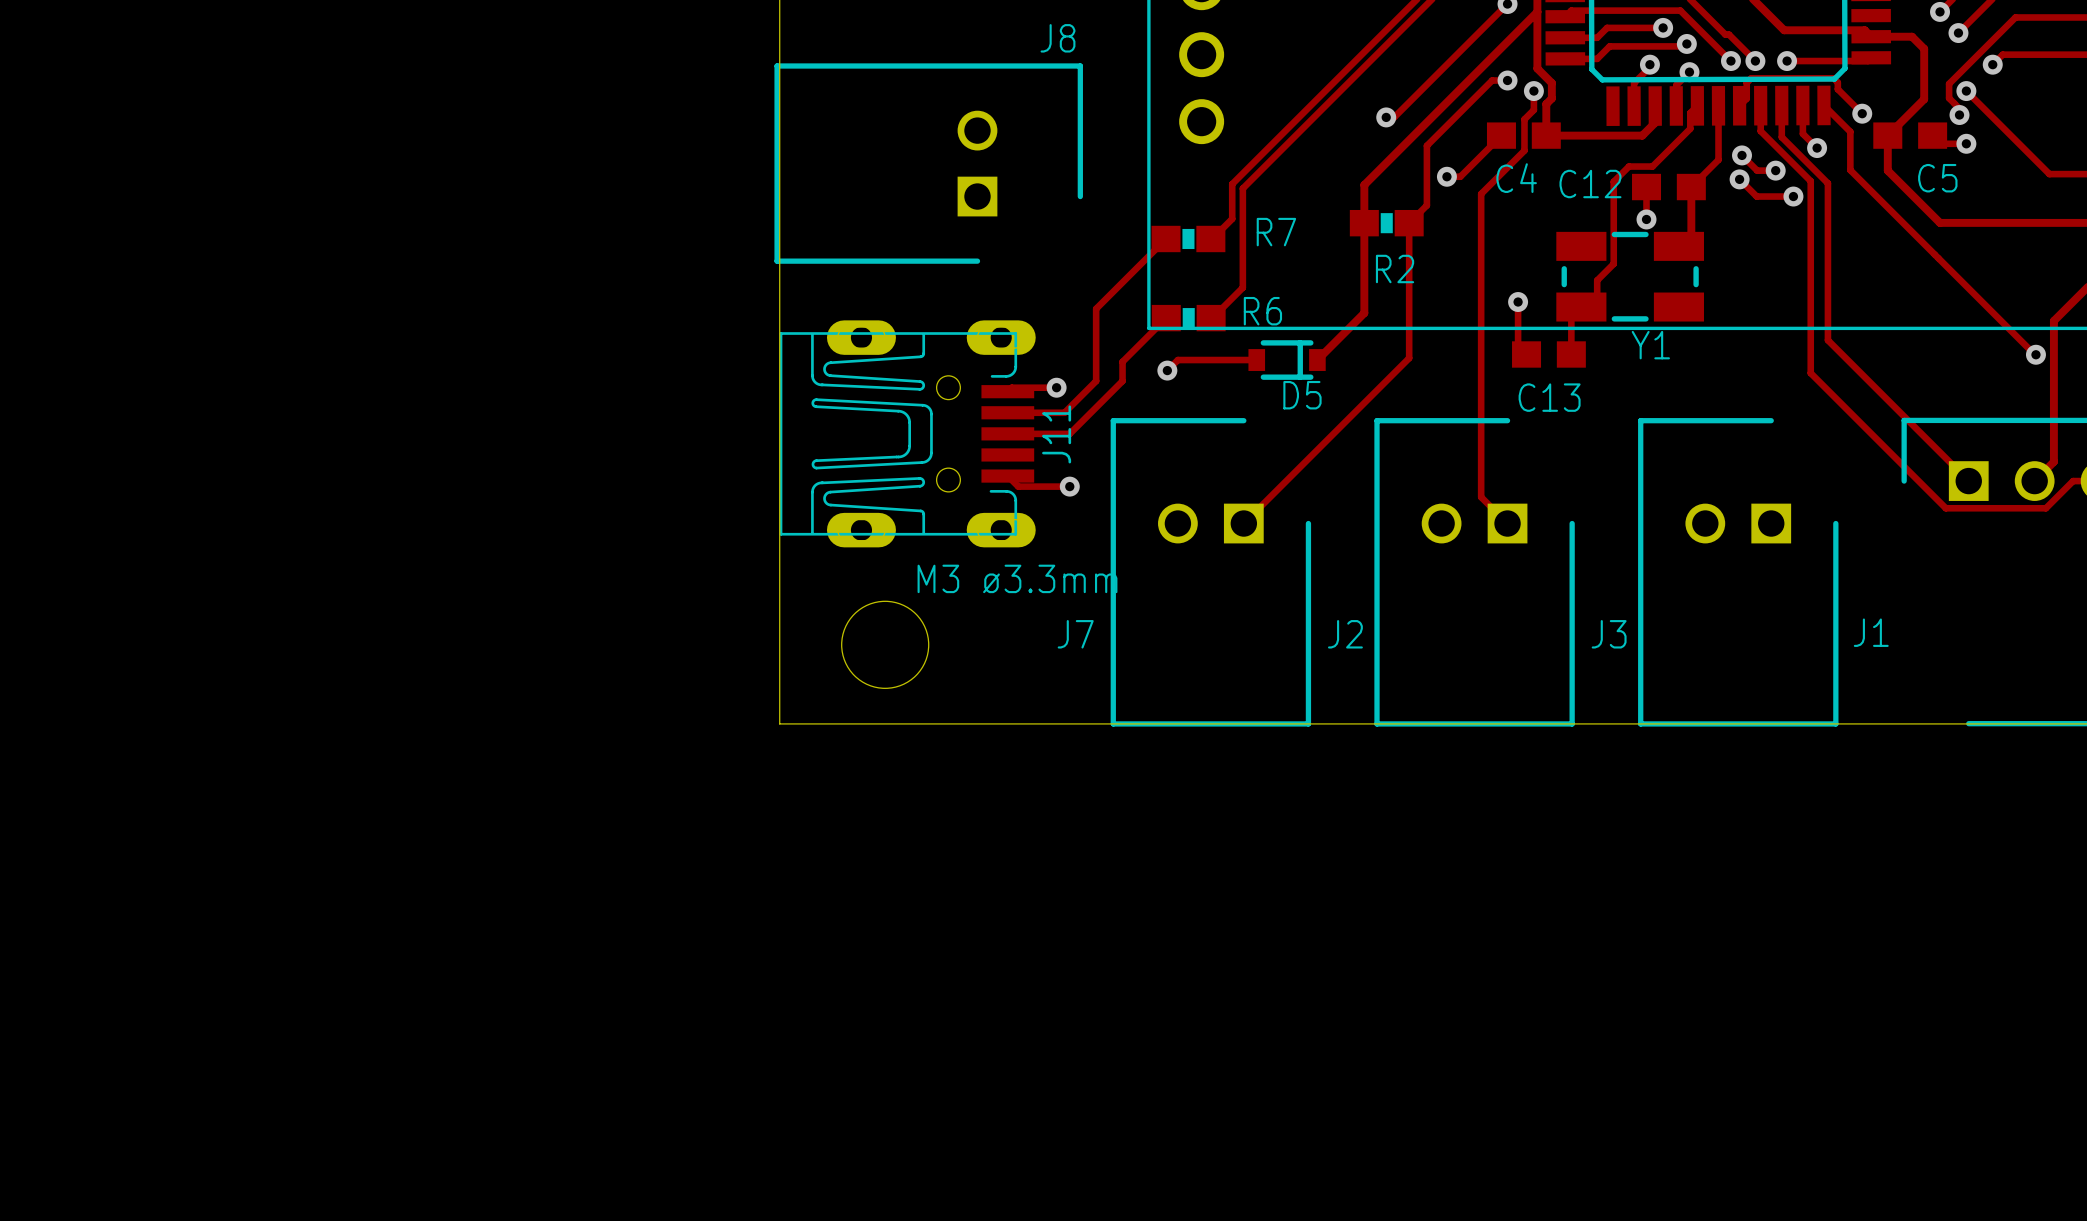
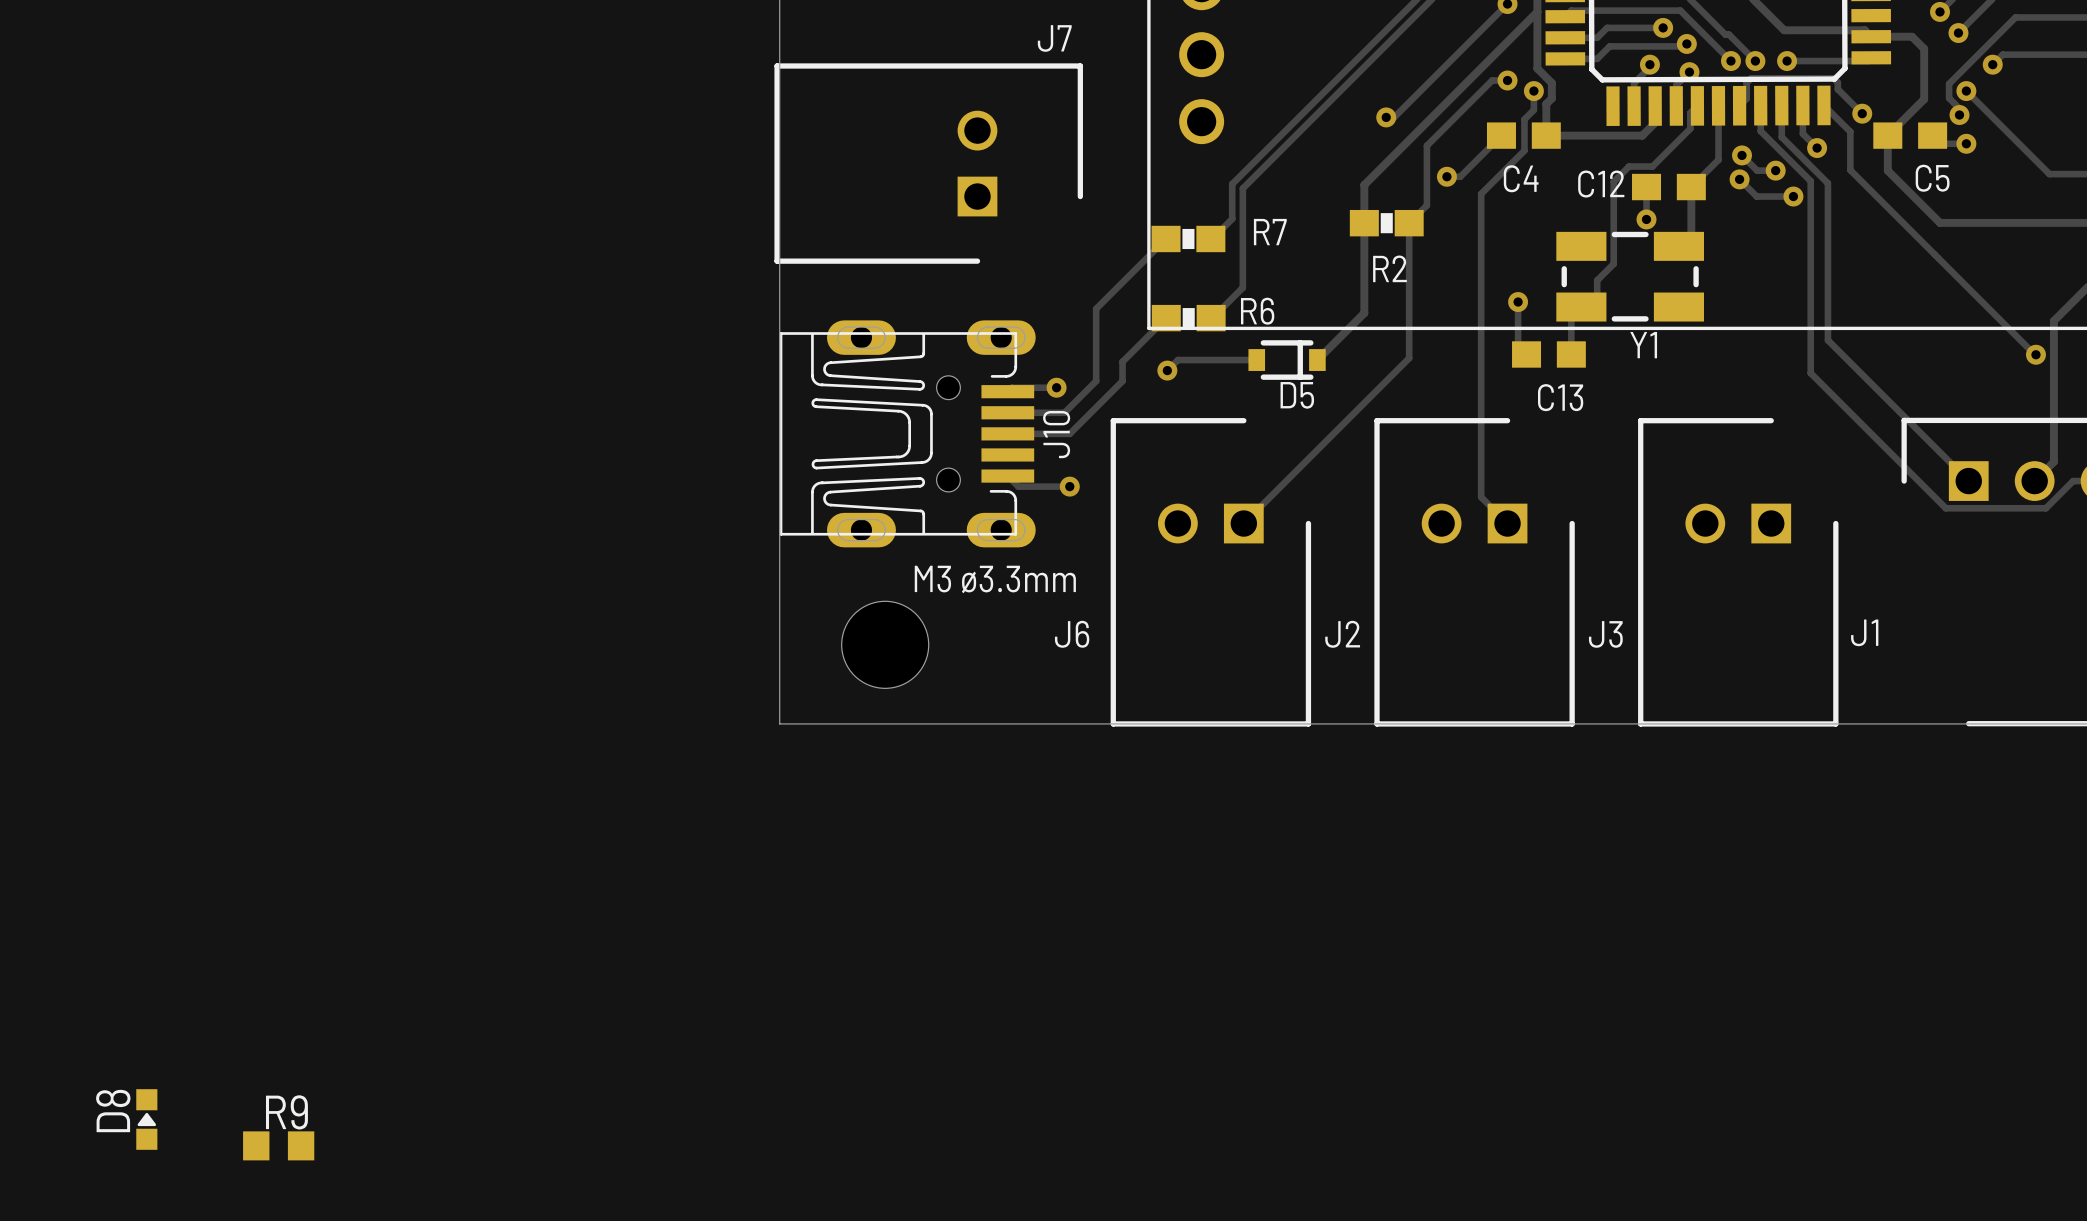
J8 name: J8 (1057, 38) -> J7 (1054, 38)
J11 name: J11 (1056, 434) -> J10 (1056, 434)
J7 name: J7 (1075, 634) -> J6 (1072, 634)
D8: none -> (146, 1119)
R9: none -> (278, 1145)

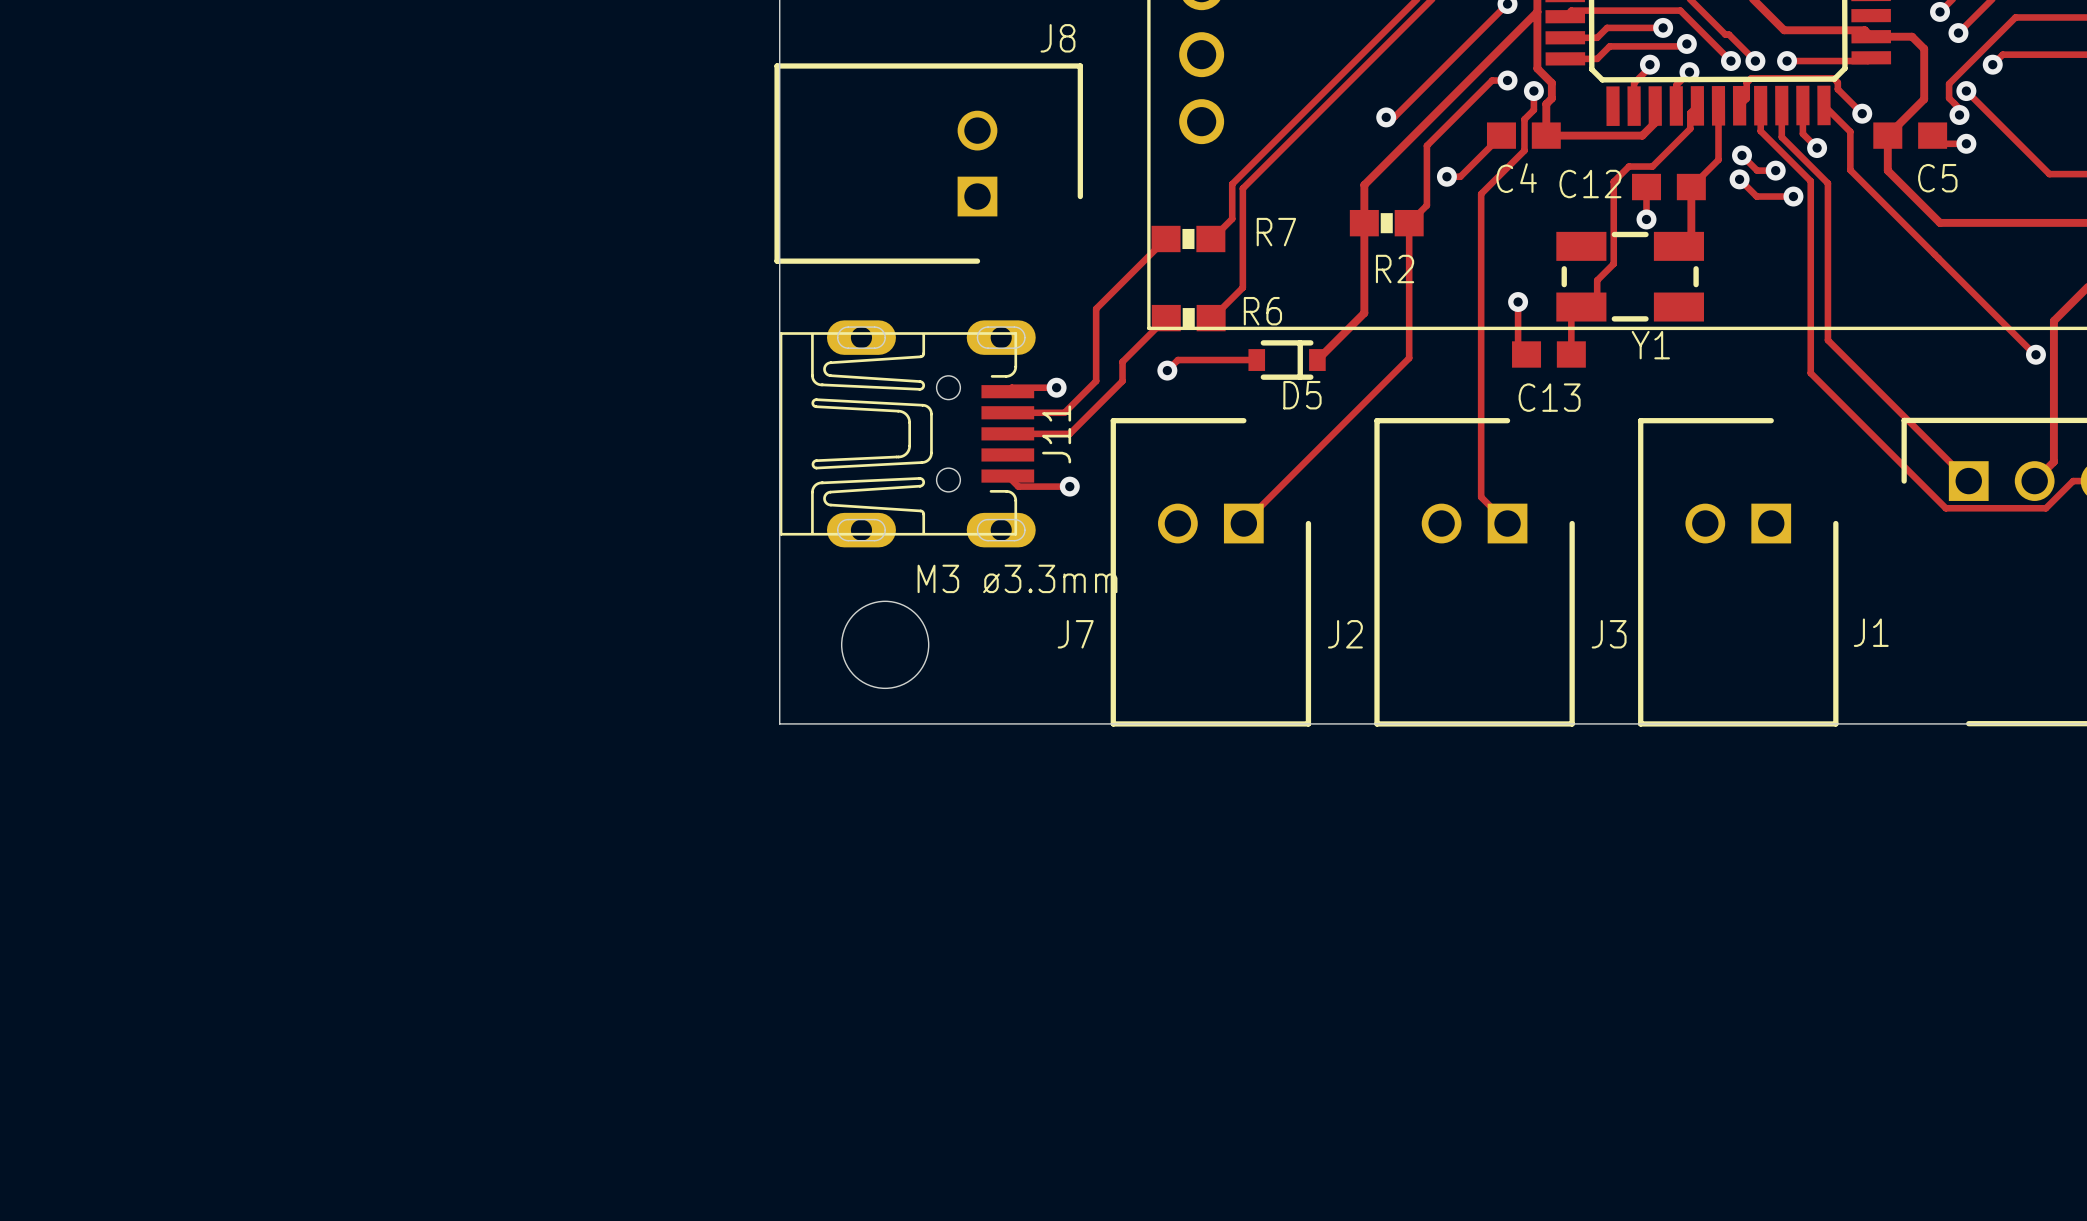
J7 name: J7 (1054, 38) -> J8 (1057, 38)
J10 name: J10 (1056, 434) -> J11 (1056, 434)
J6 name: J6 (1072, 634) -> J7 (1075, 634)
D8: (146, 1119) -> none
R9: (278, 1145) -> none

